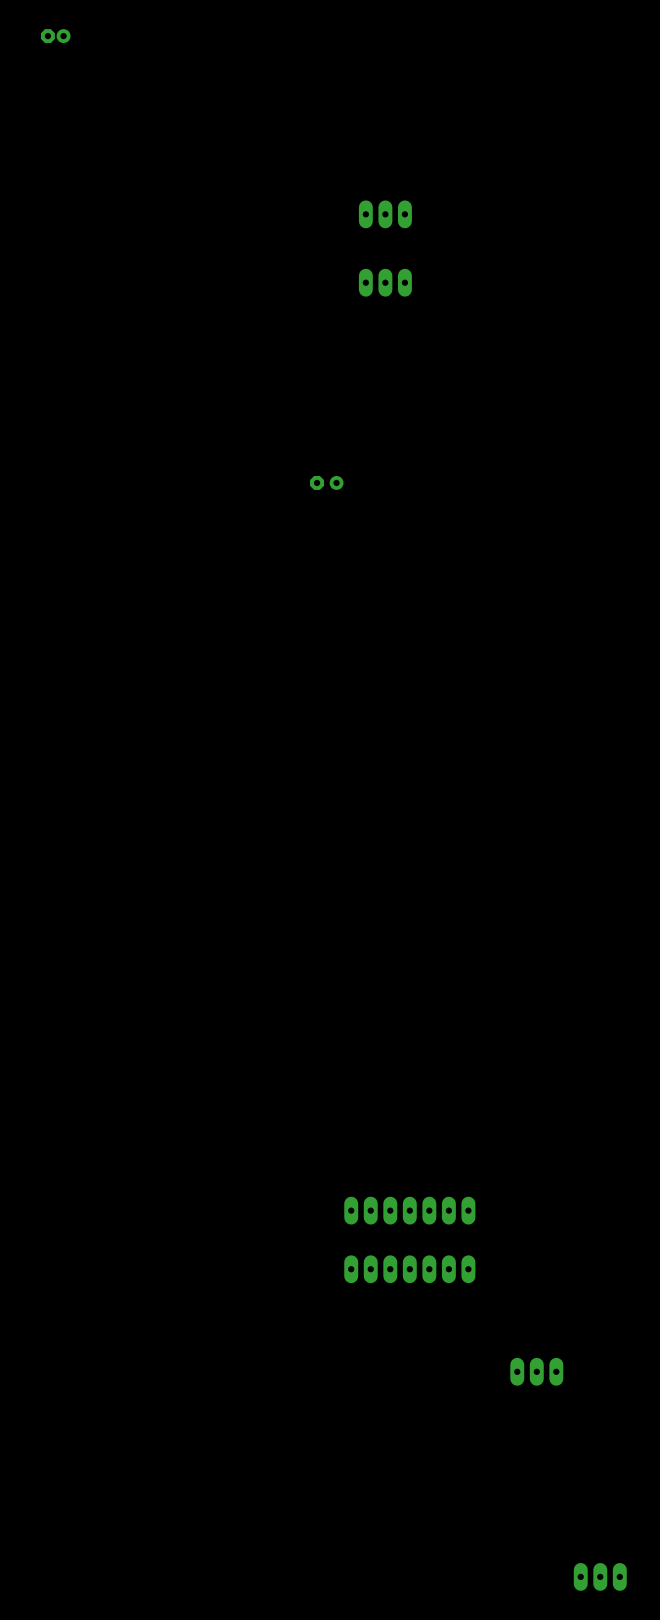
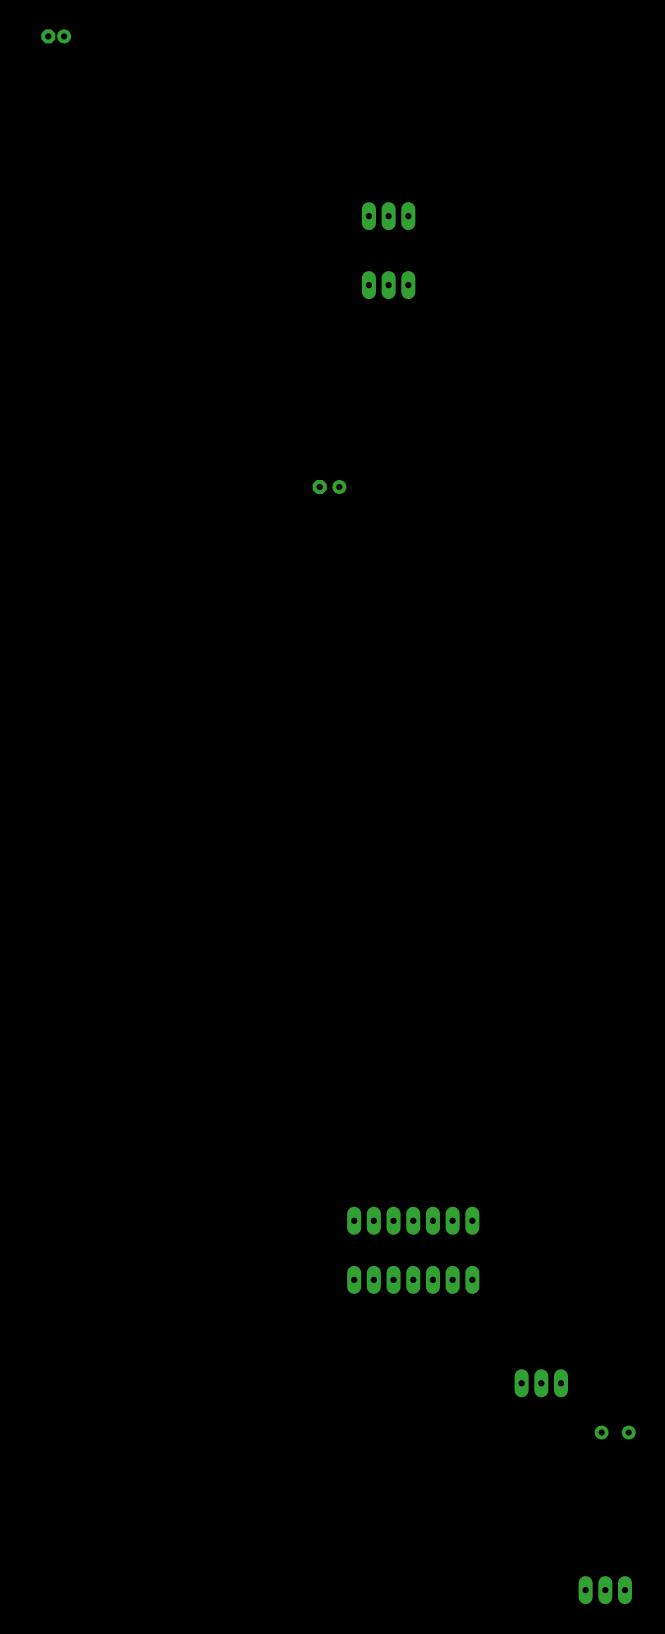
part: none -> (615, 1432)

